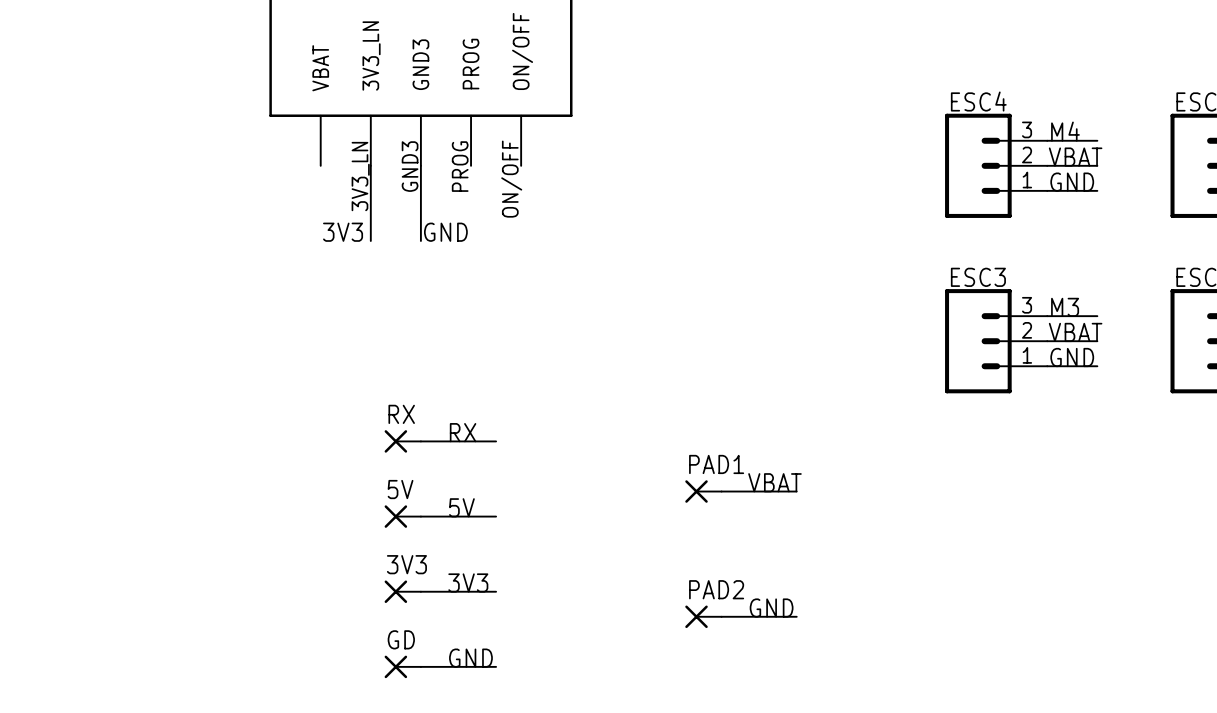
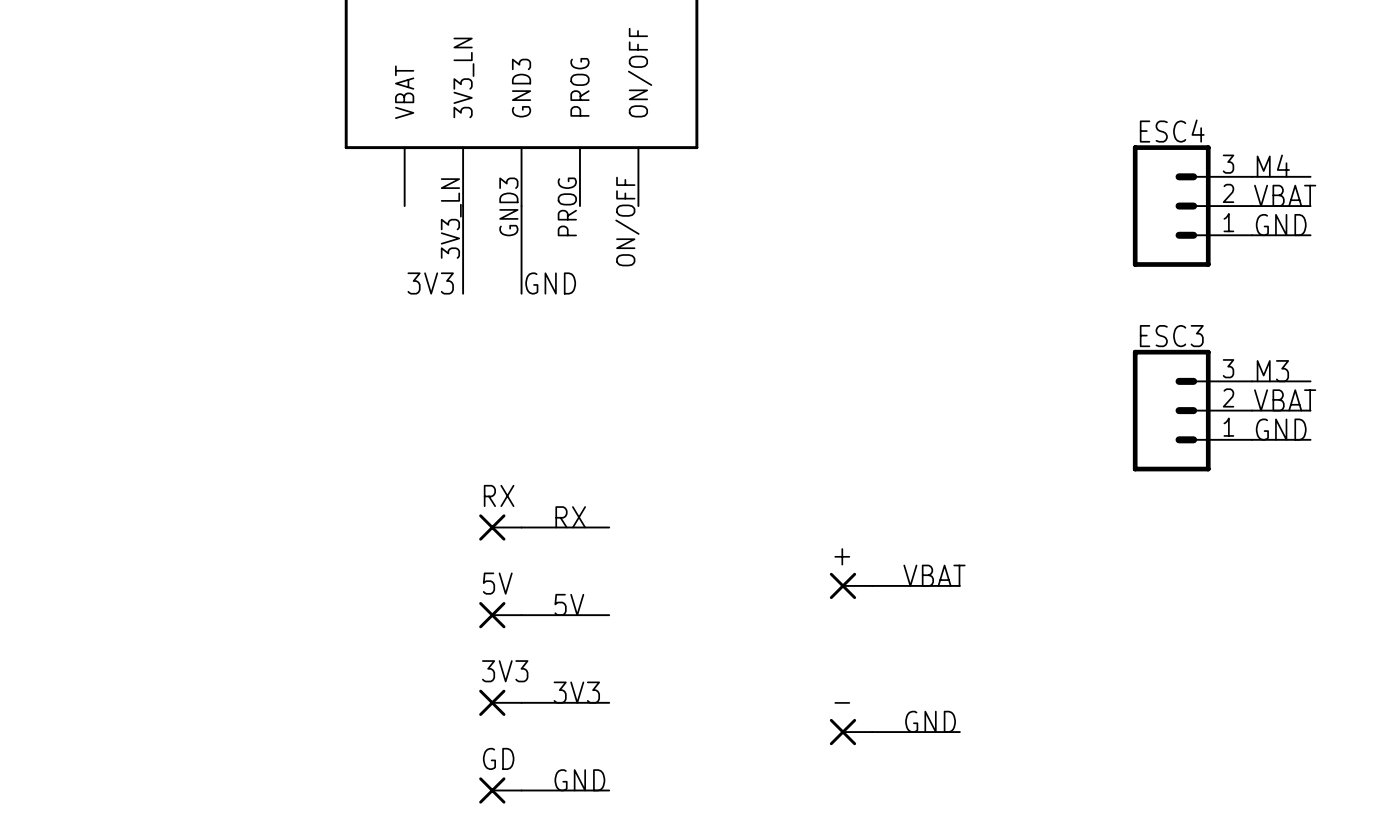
PAD1 name: PAD1 (716, 464) -> + (842, 556)
PAD2 name: PAD2 (716, 589) -> - (842, 702)

